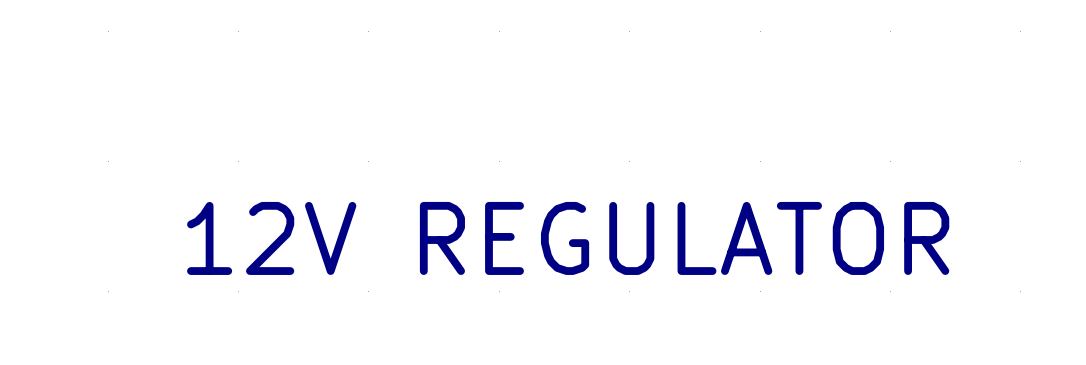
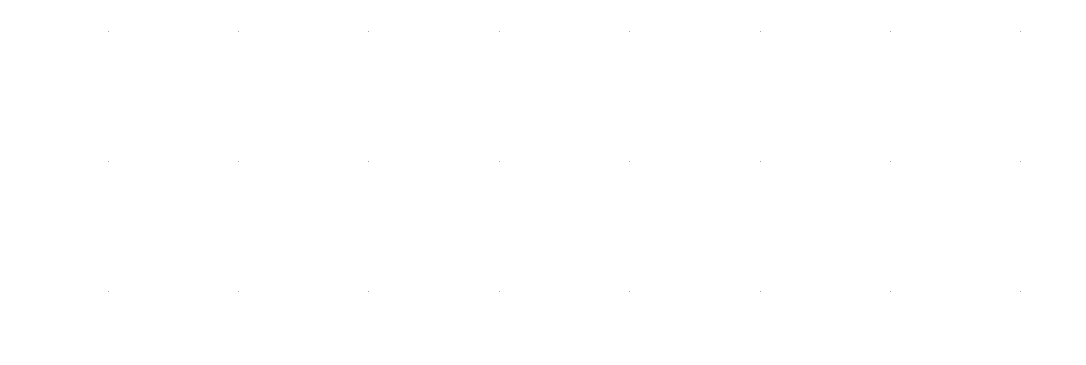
text: 12V REGULATOR (568, 238) -> none

